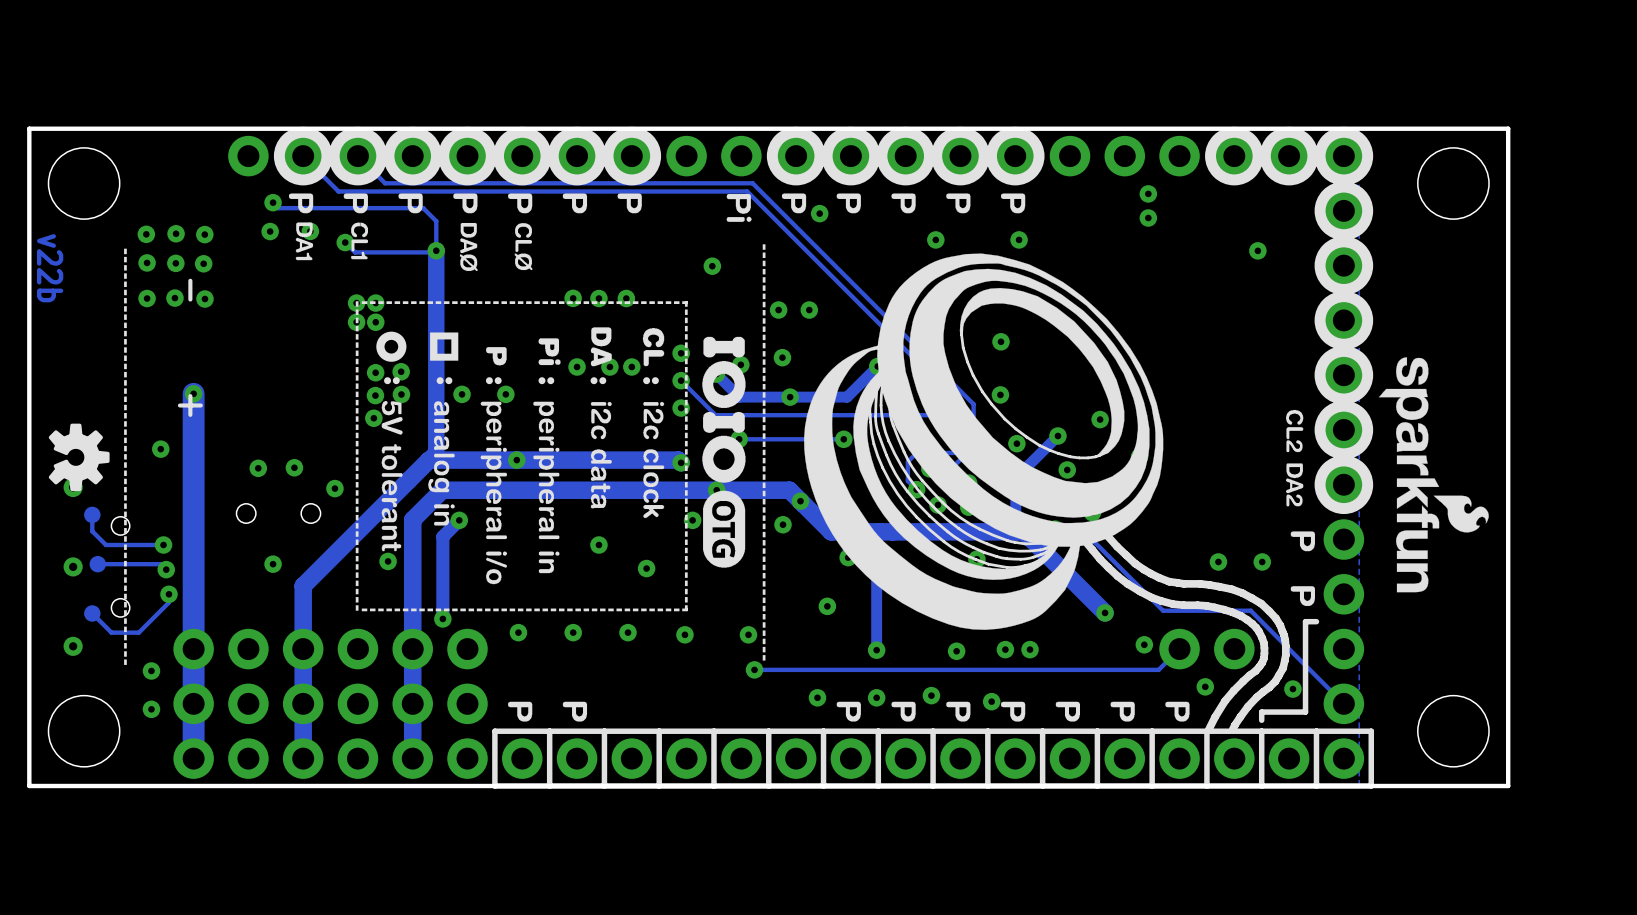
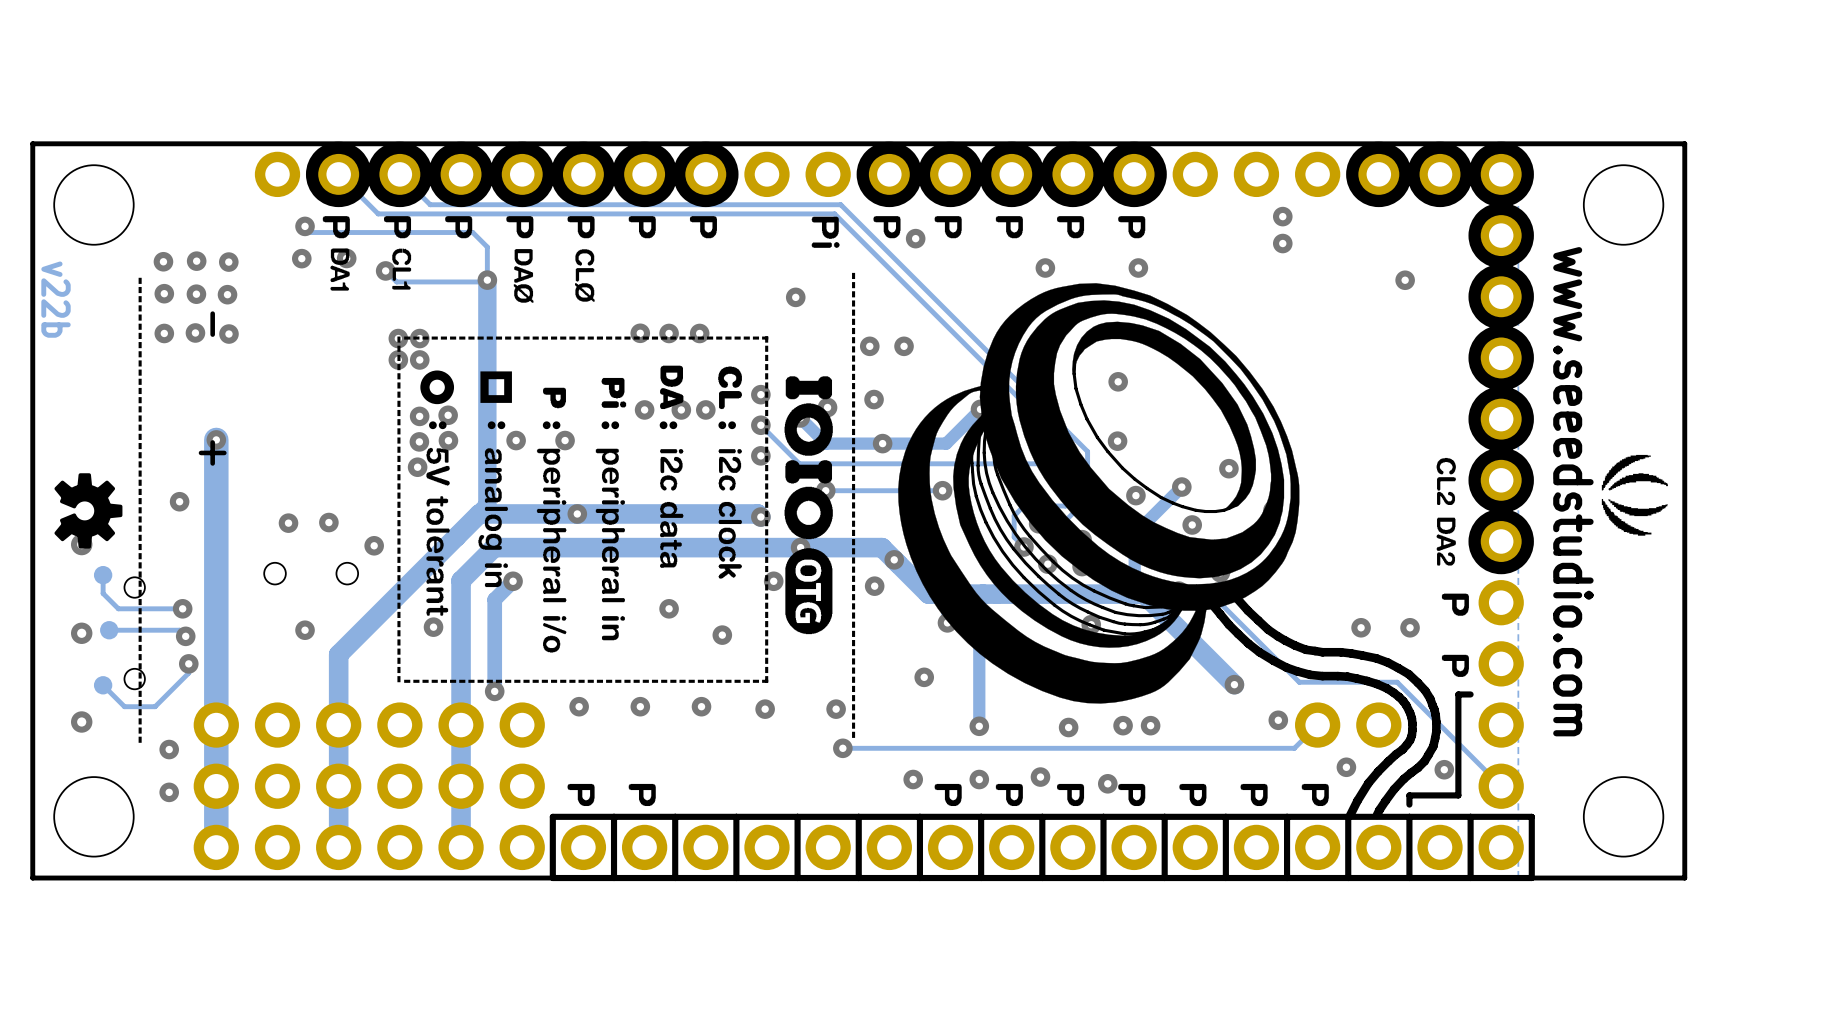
drawing: [1378, 357, 1489, 593] -> none
drawing: none -> [1601, 454, 1668, 536]
text: none -> www.seeedstudio.com (1573, 491)

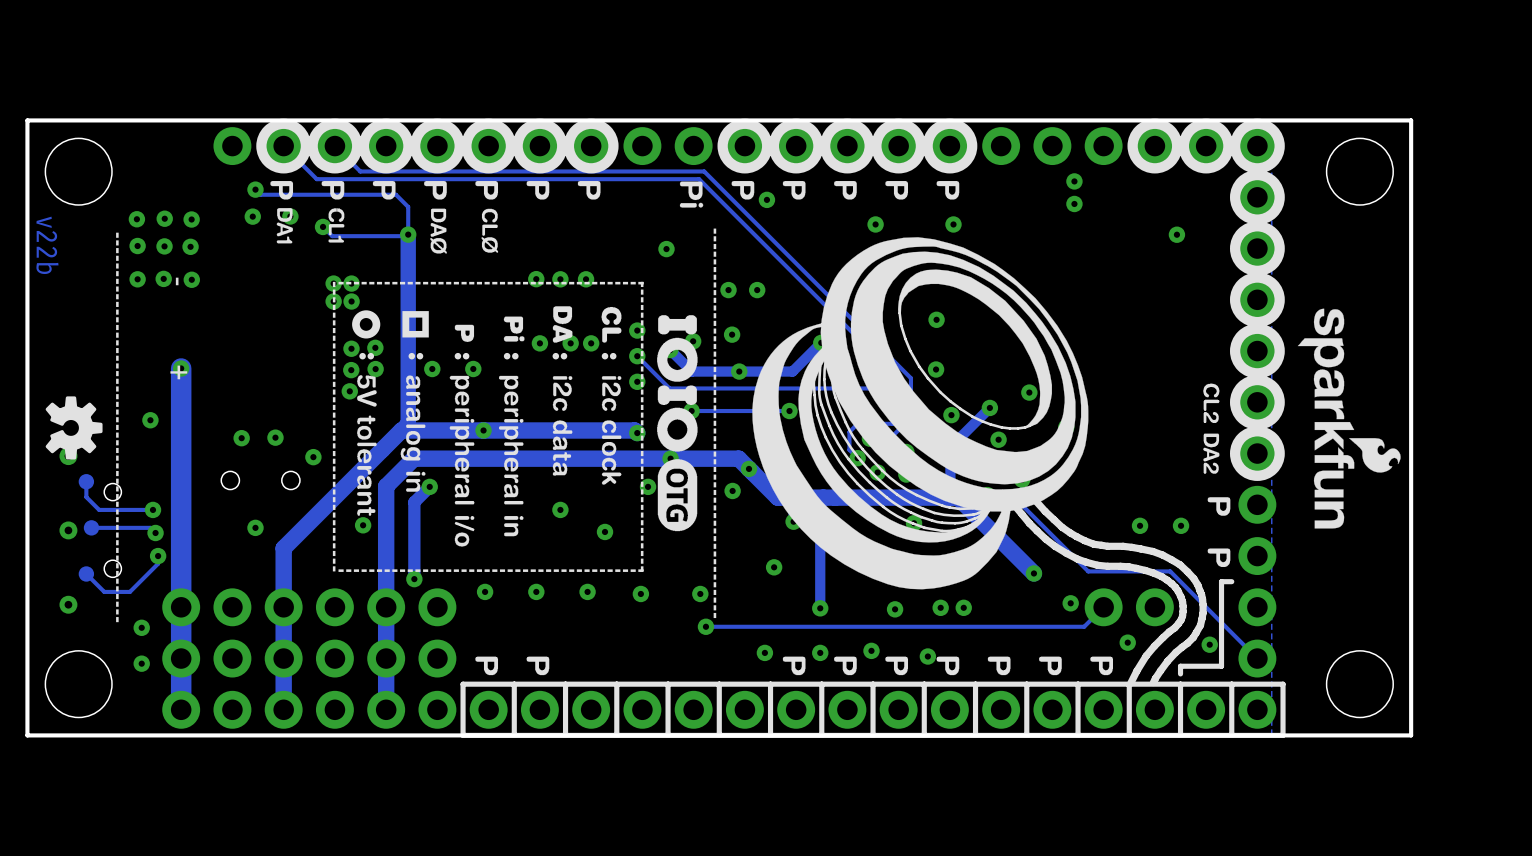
drawing: none -> [1297, 308, 1401, 529]
drawing: [1601, 454, 1668, 536] -> none
text: www.seeedstudio.com (1573, 491) -> none

